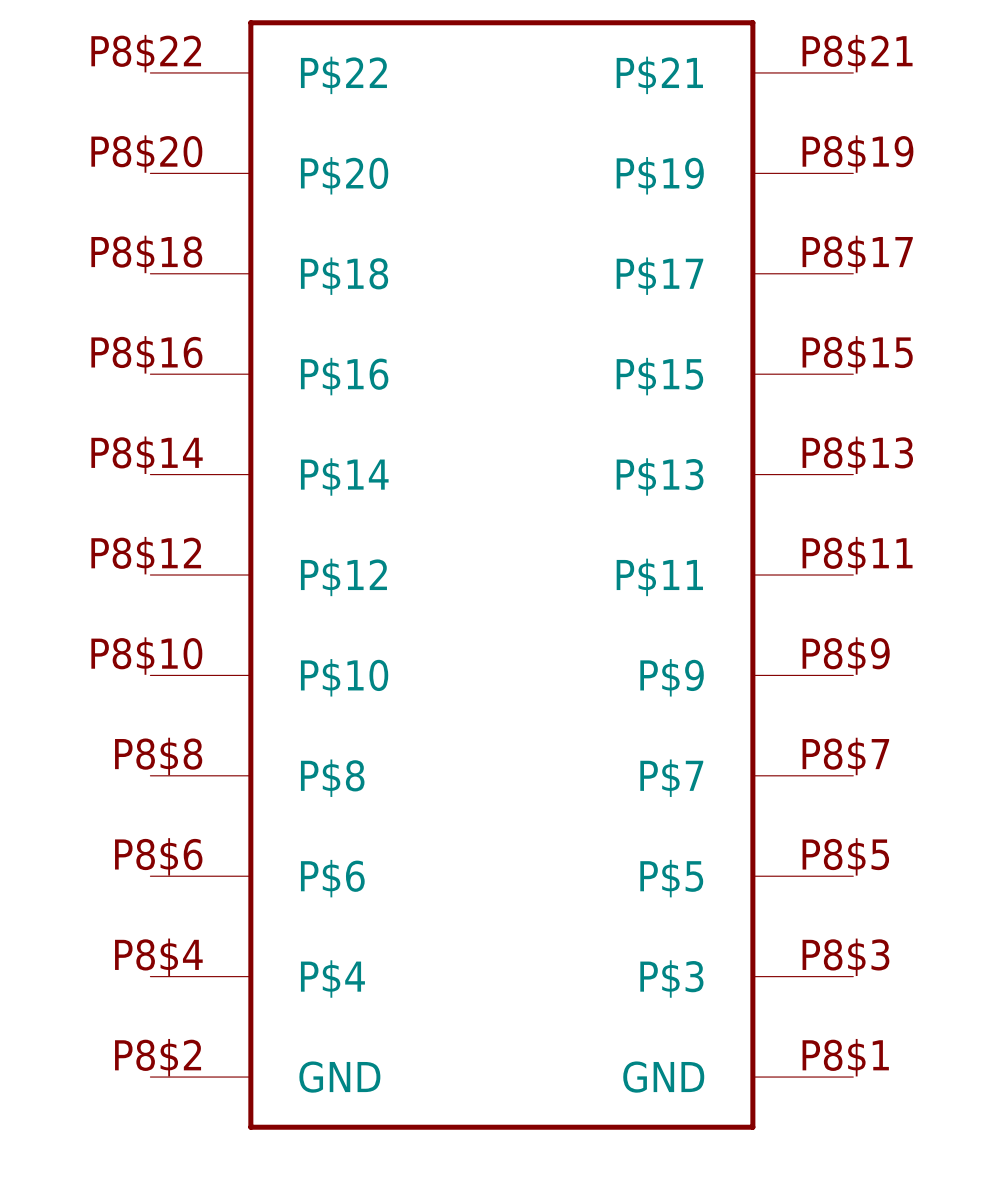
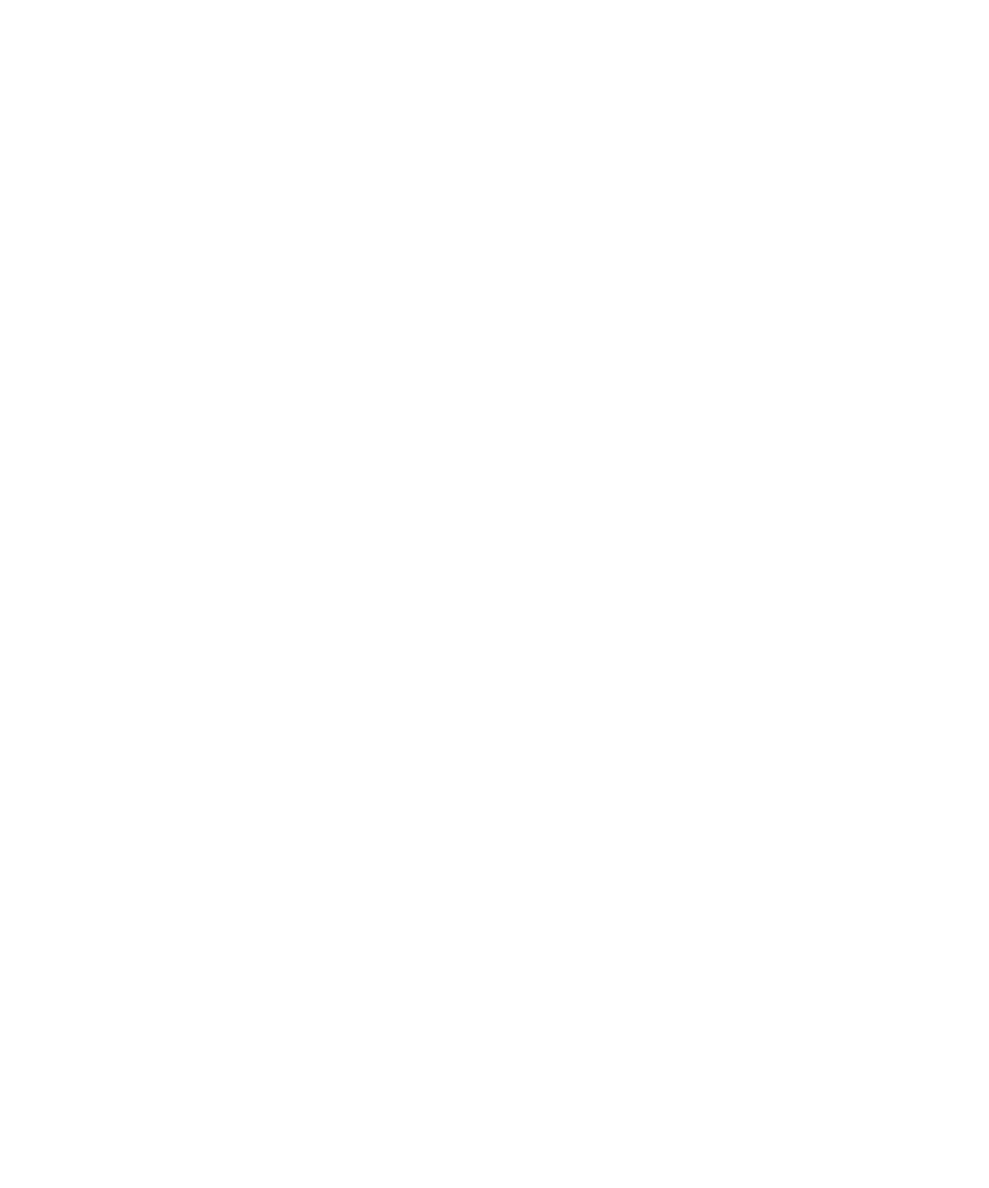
part: (501, 575) -> none

